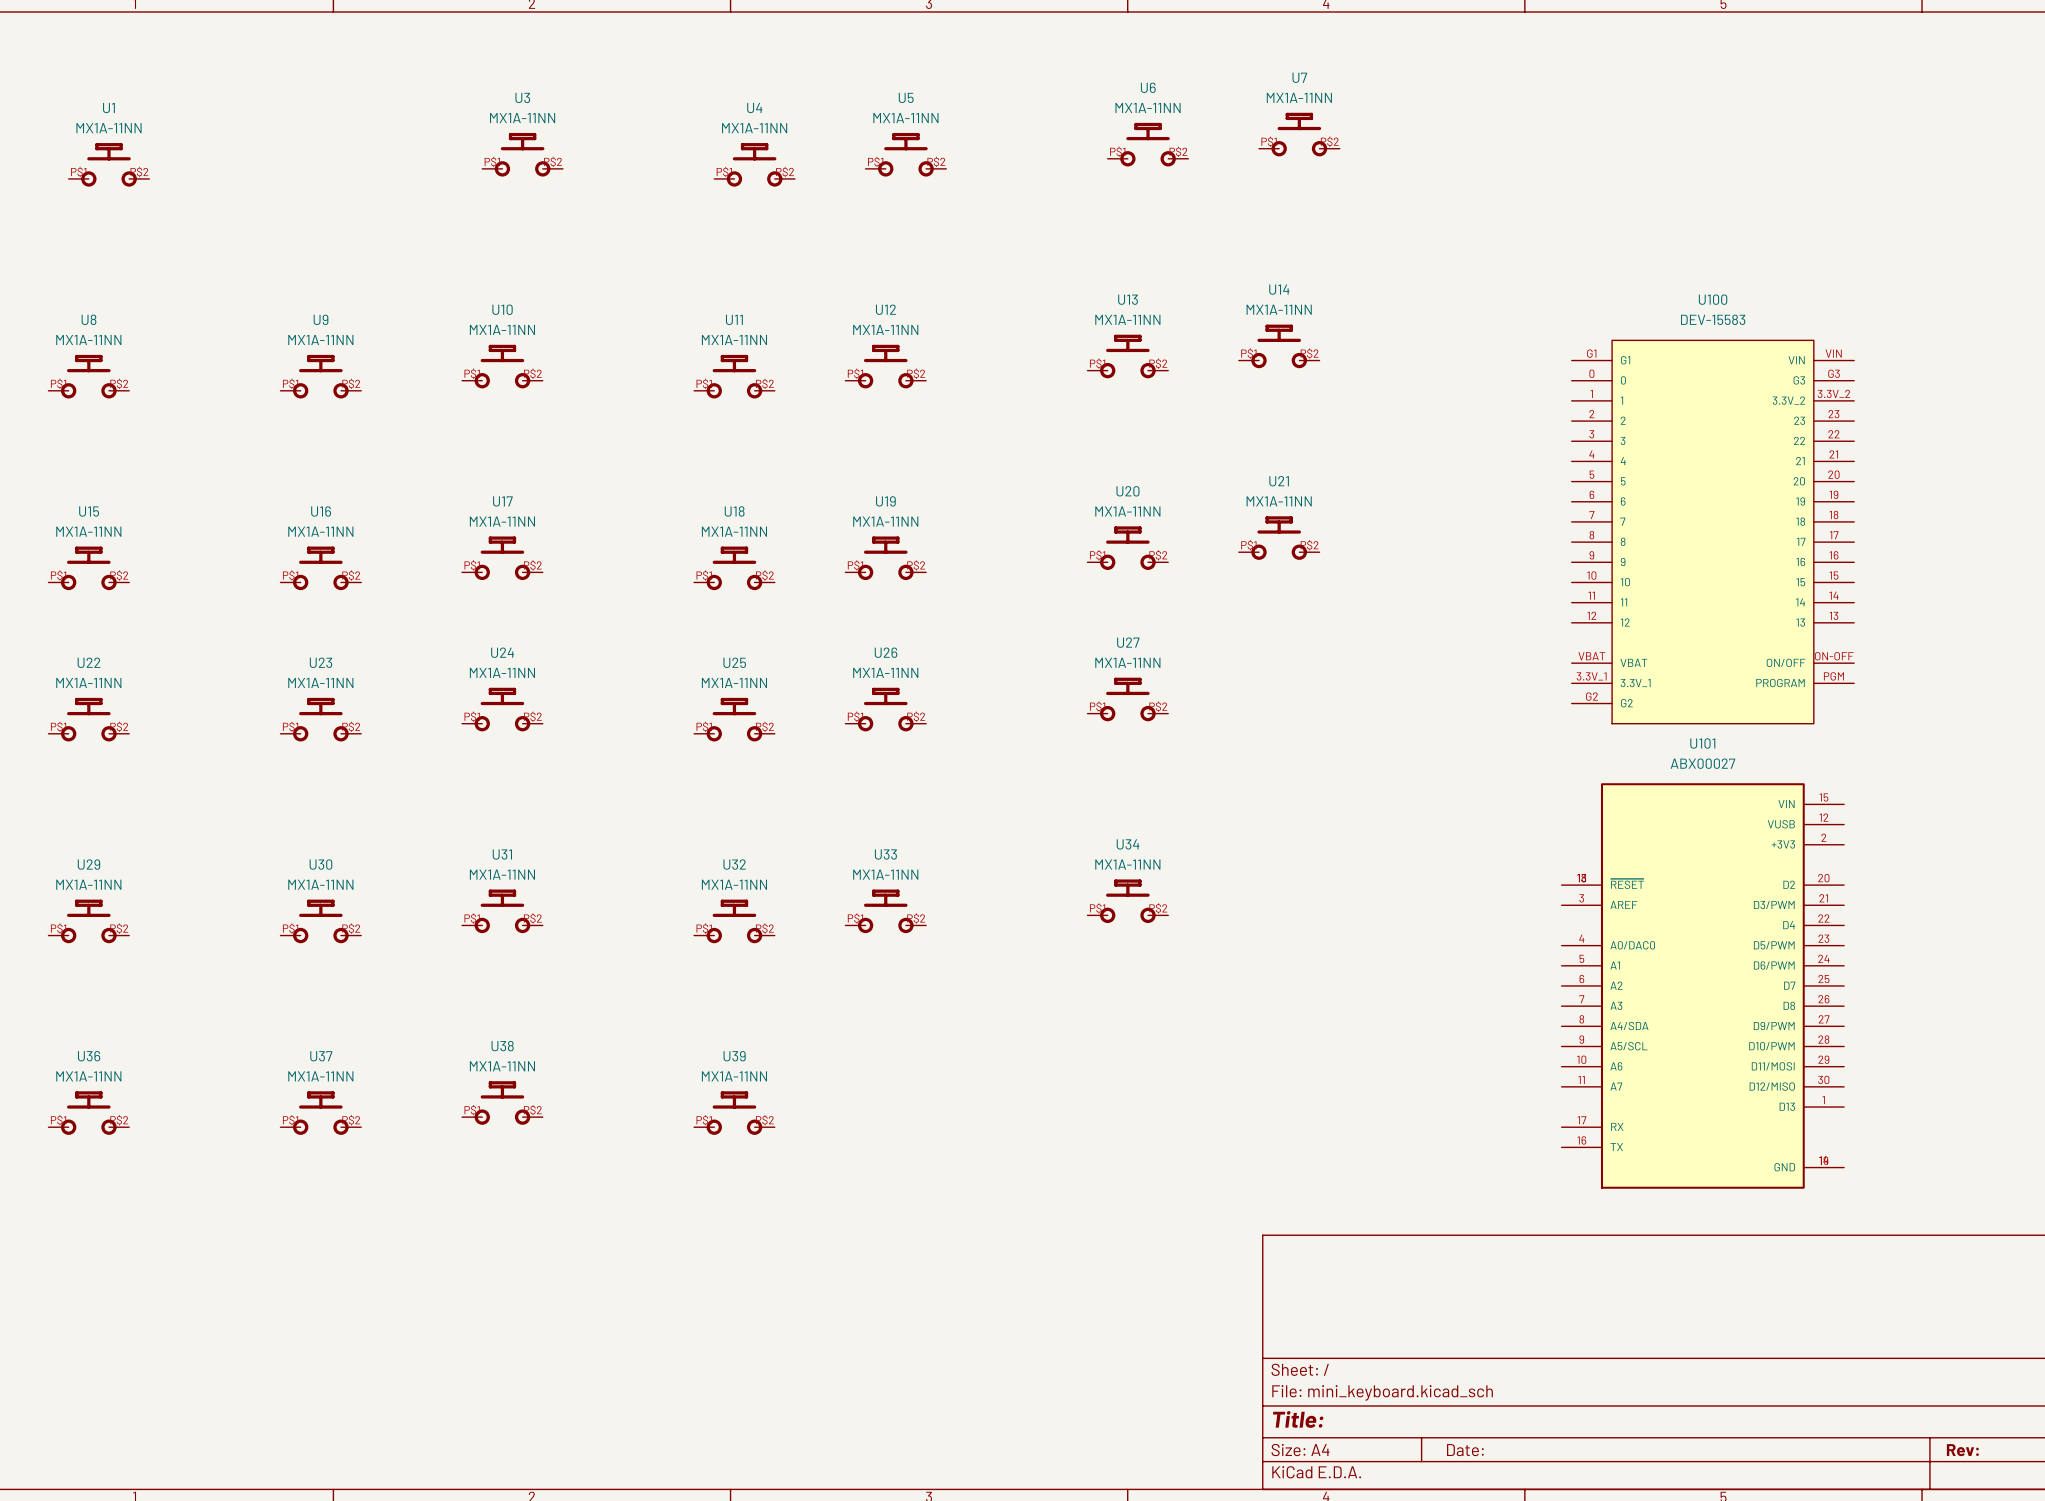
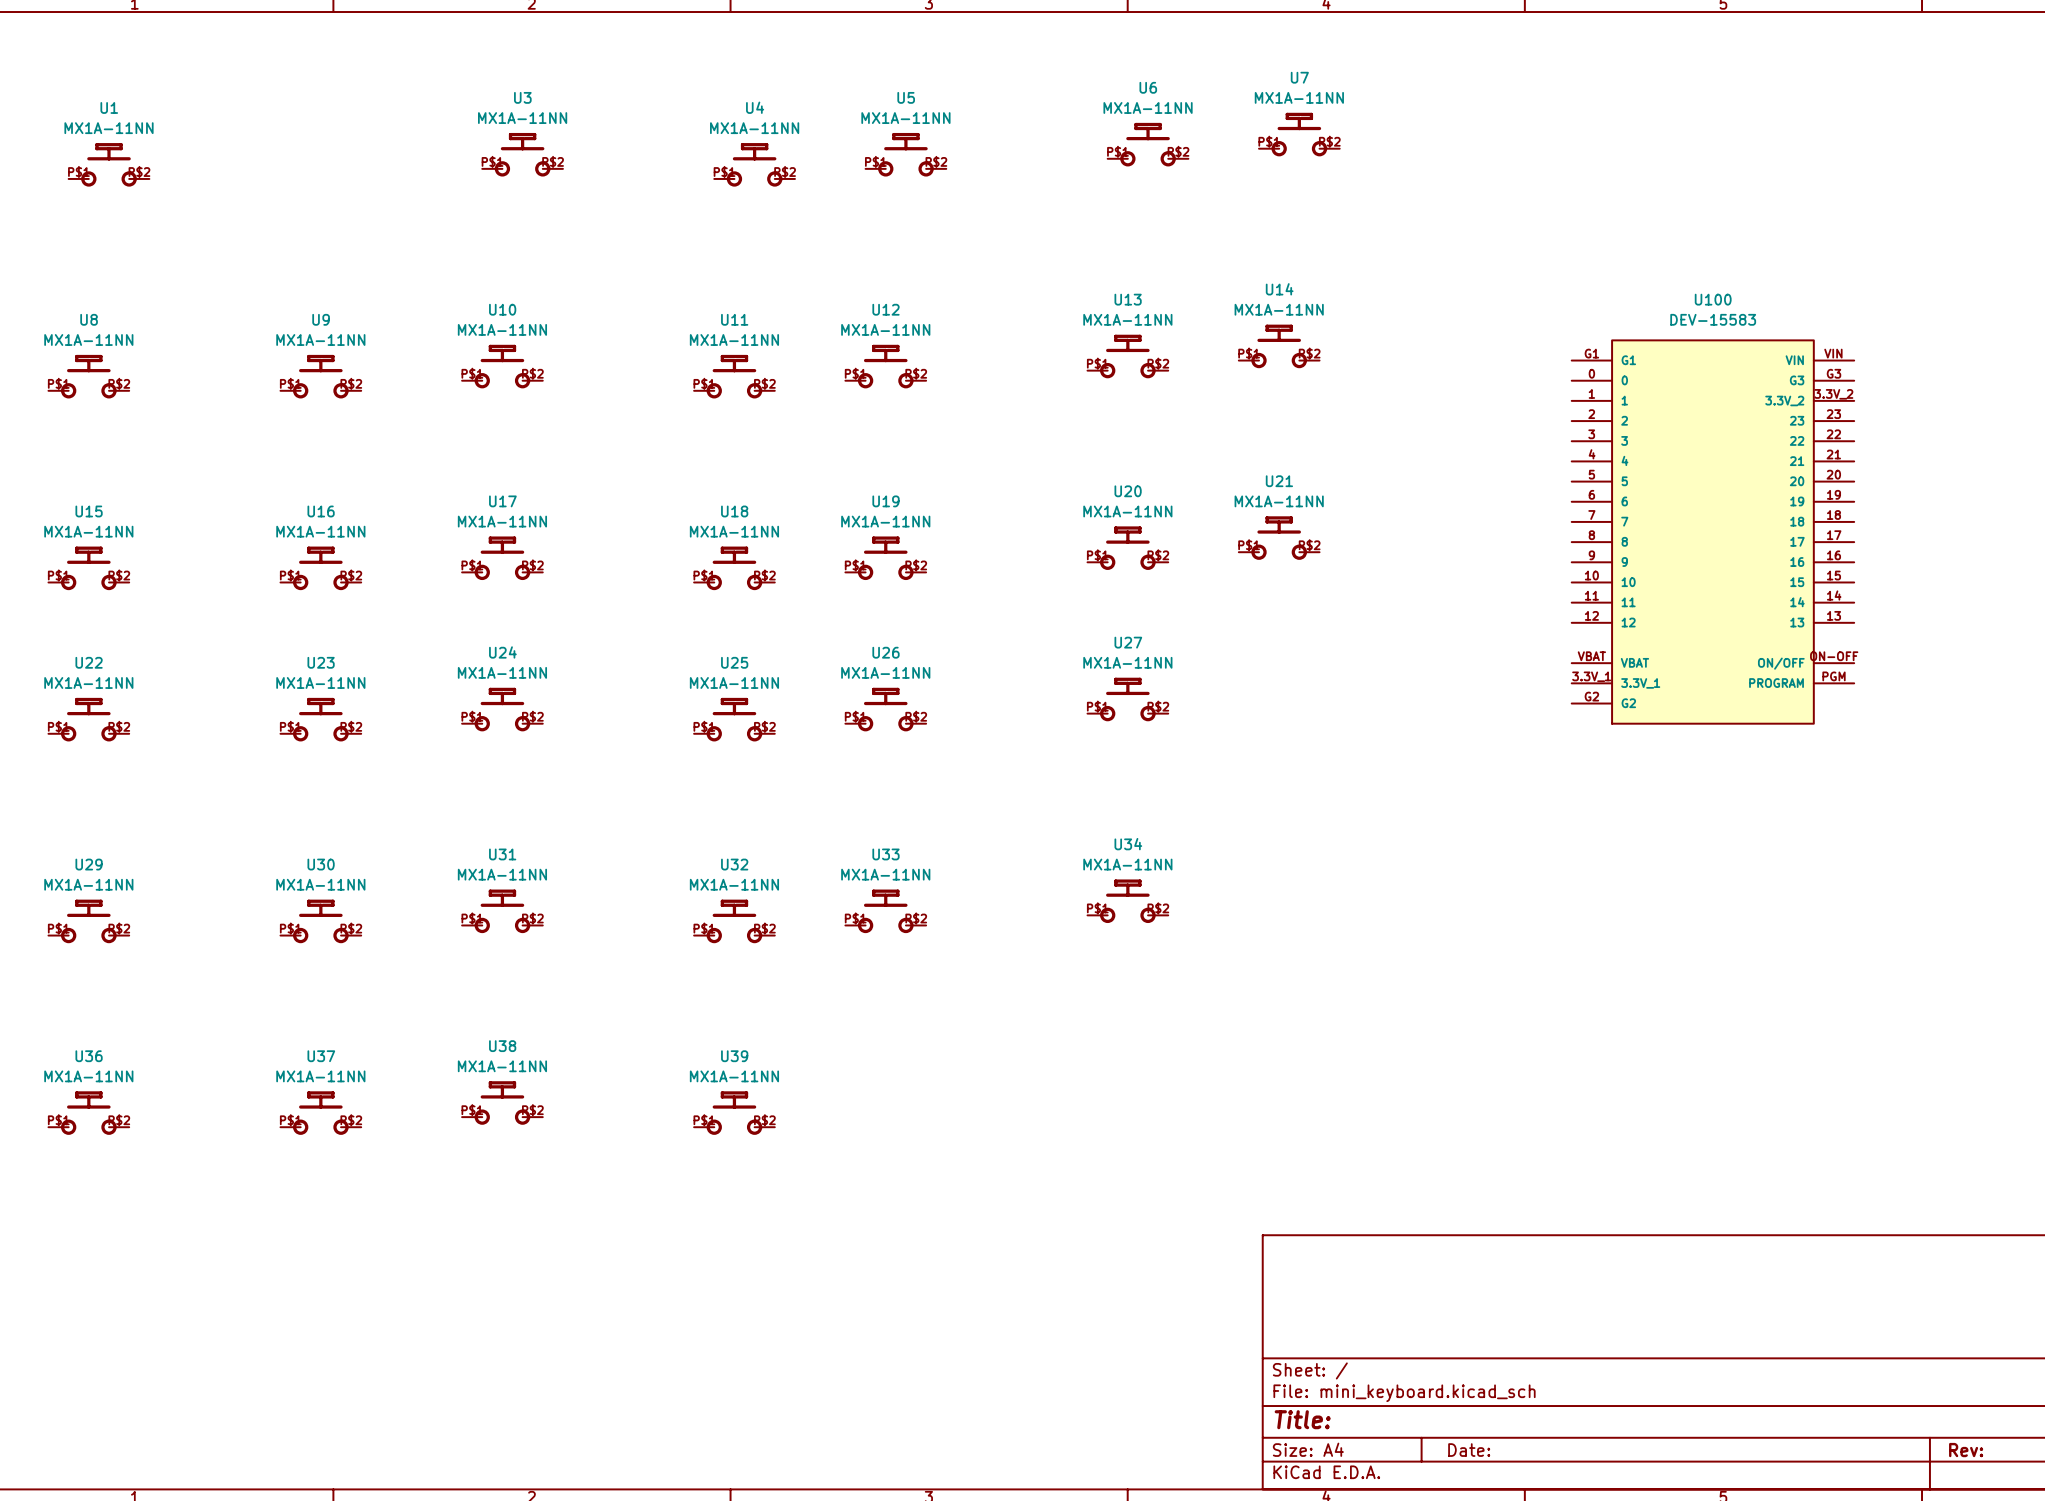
U101: ABX00027 (1702, 985) -> none

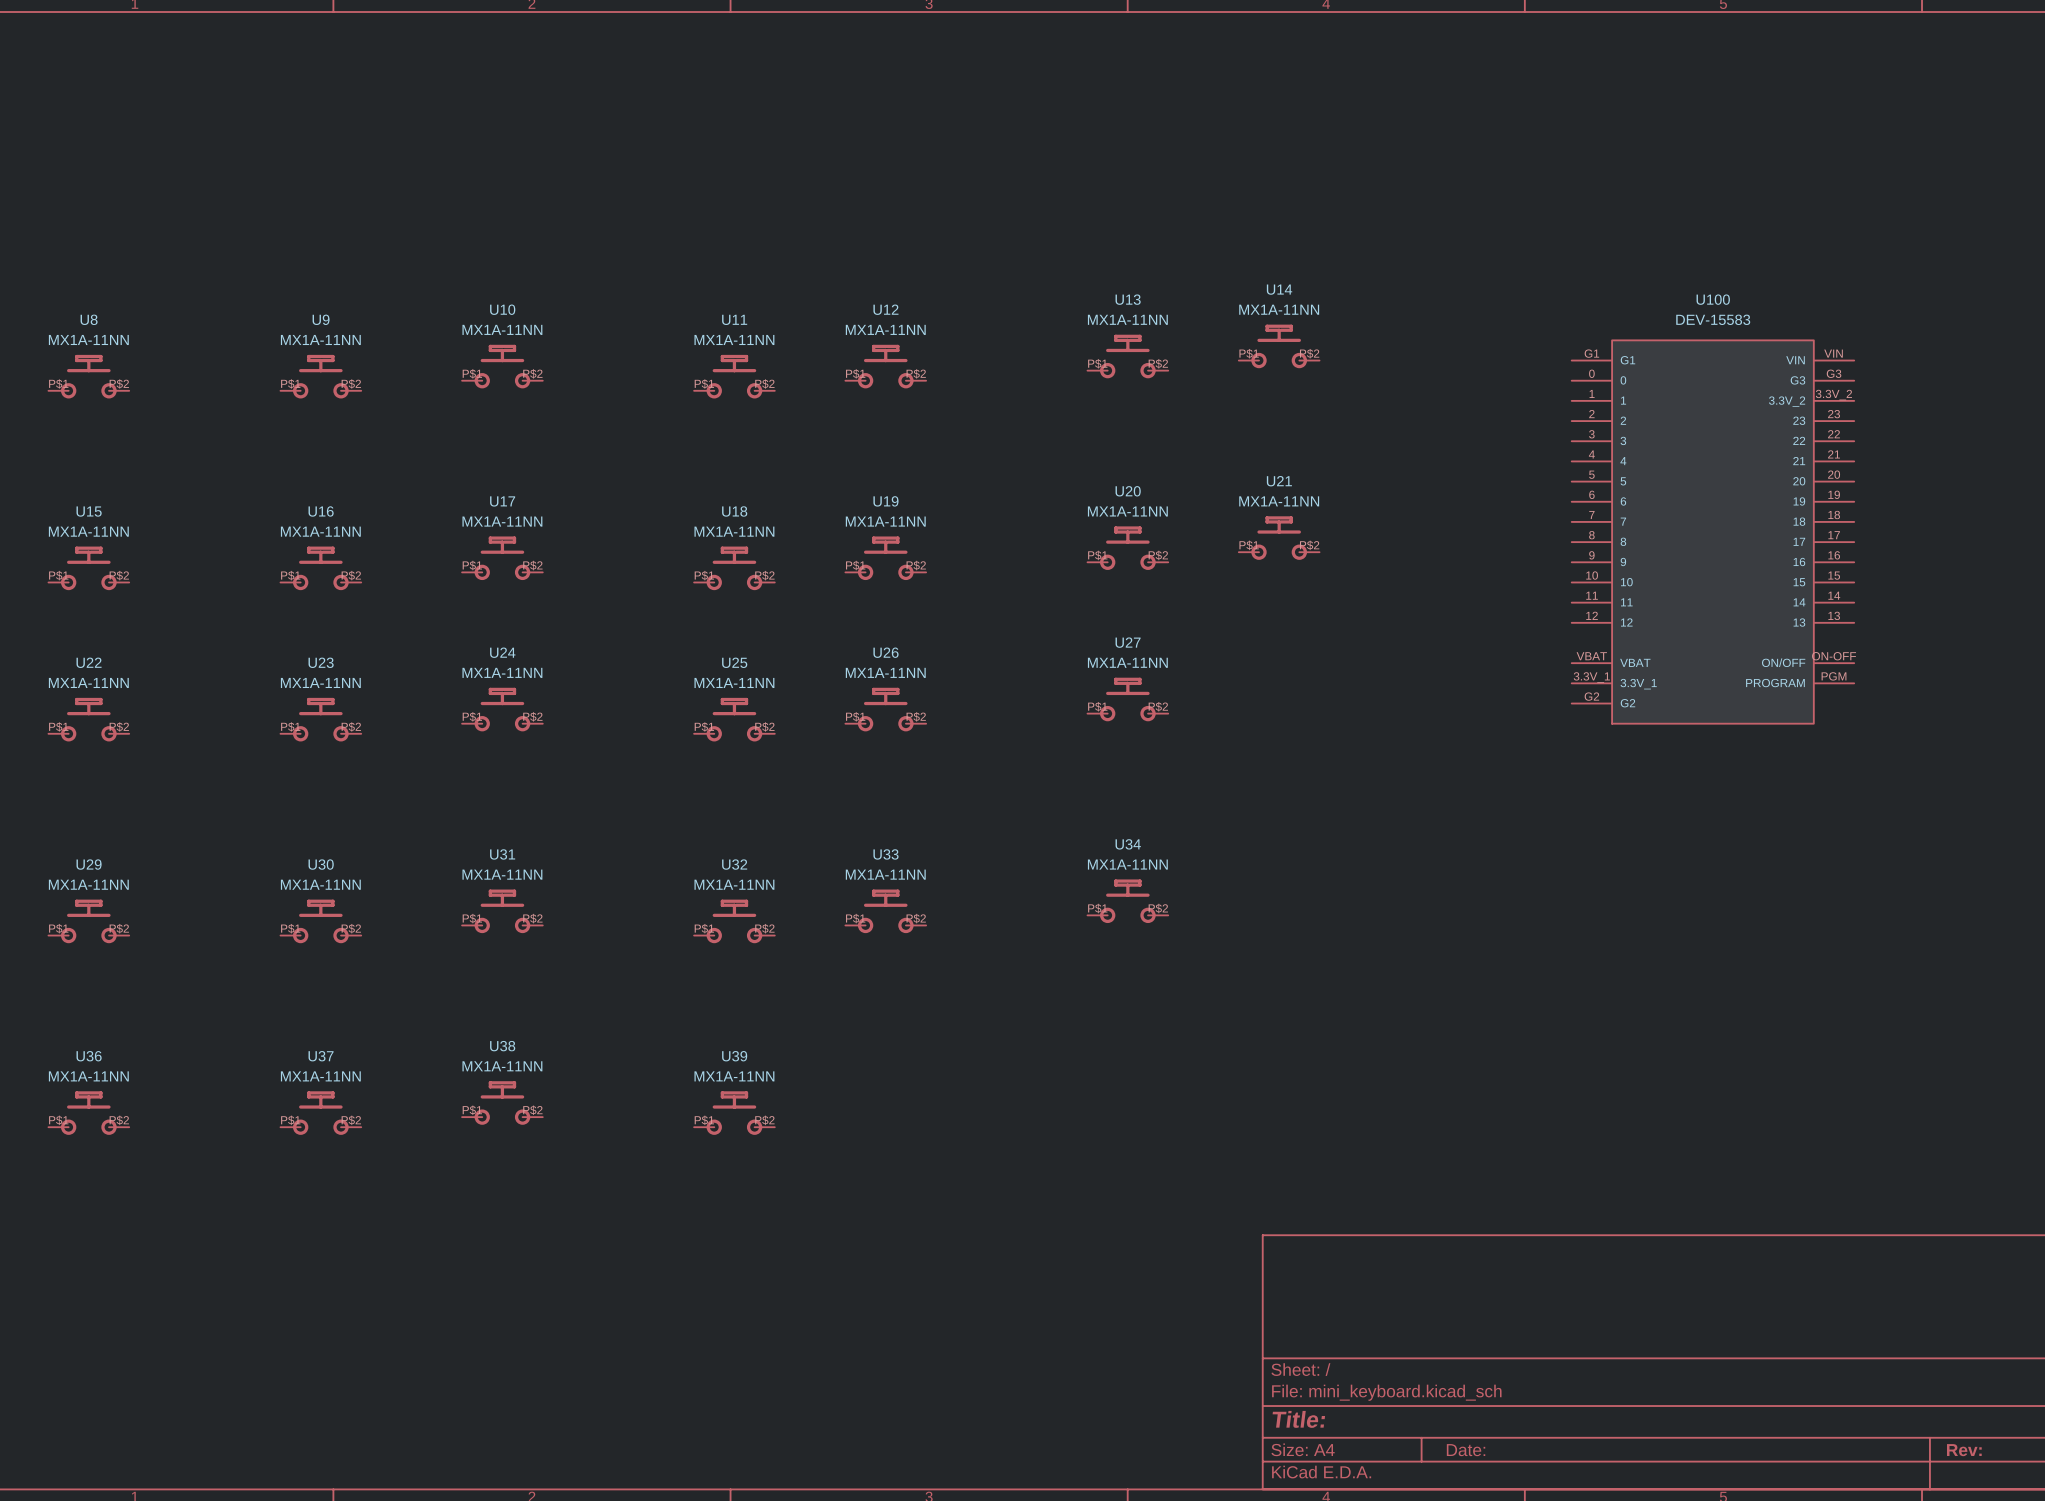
U7: MX1A-11NN (1299, 134) -> none
U6: MX1A-11NN (1148, 144) -> none
U3: MX1A-11NN (522, 154) -> none
U5: MX1A-11NN (905, 154) -> none
U1: MX1A-11NN (109, 164) -> none
U4: MX1A-11NN (754, 164) -> none

